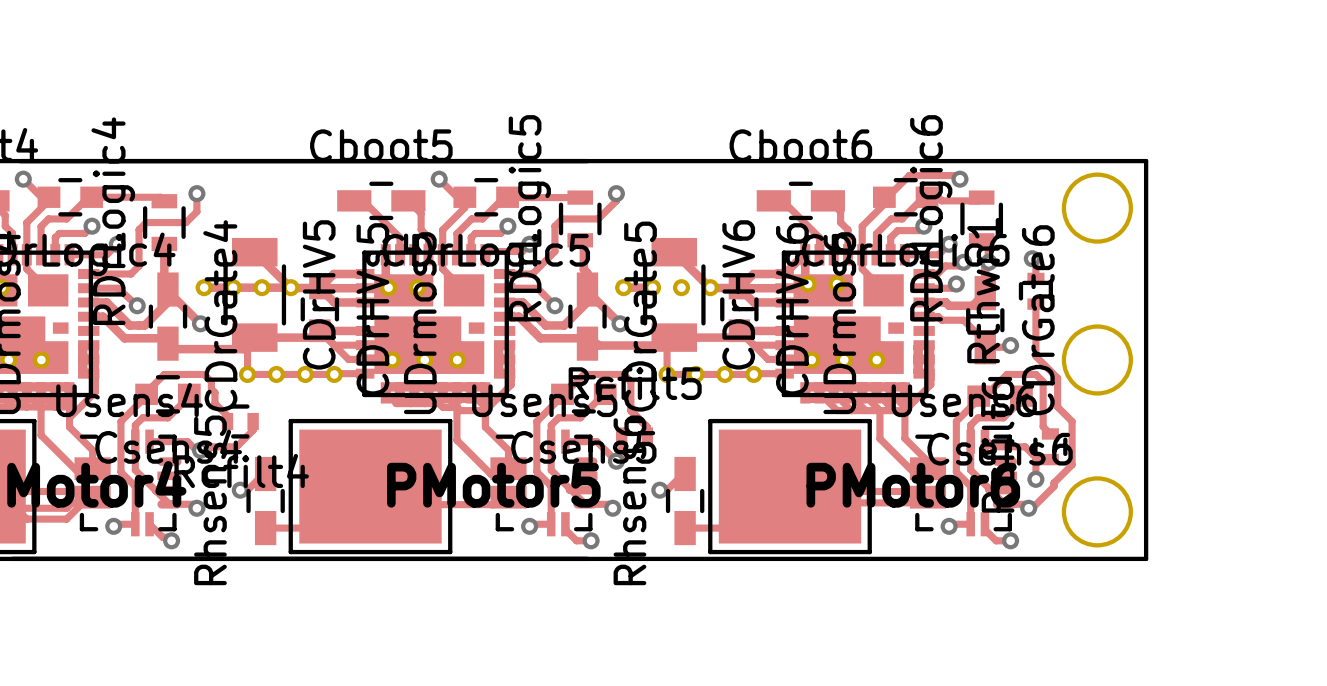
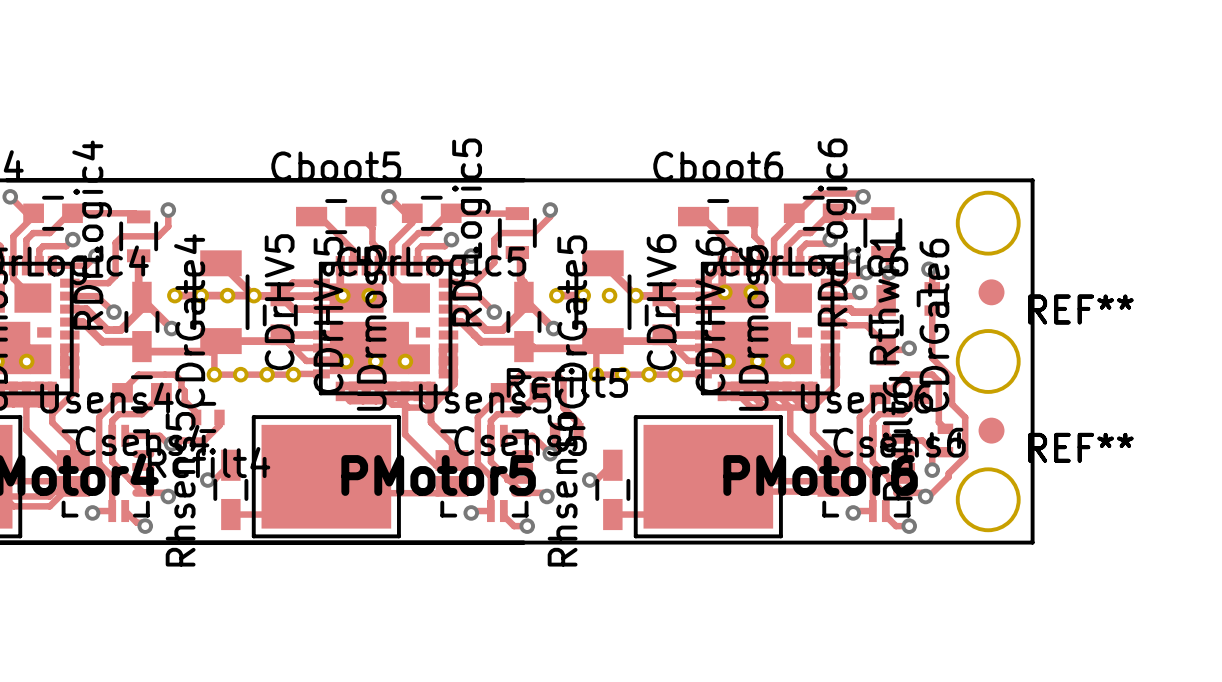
REF**: none -> (991, 292)
REF**: none -> (1080, 309)
REF**: none -> (991, 430)
REF**: none -> (1080, 447)

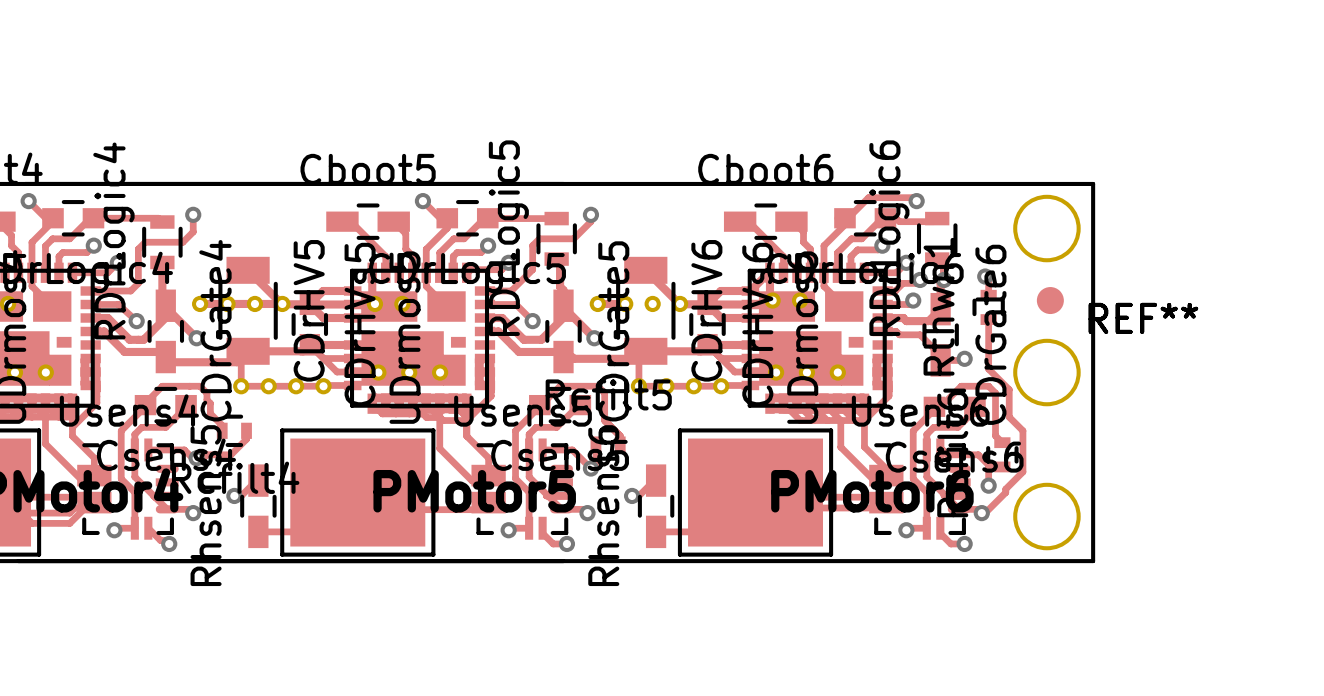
REF**: (991, 430) -> none
REF**: (1080, 447) -> none

